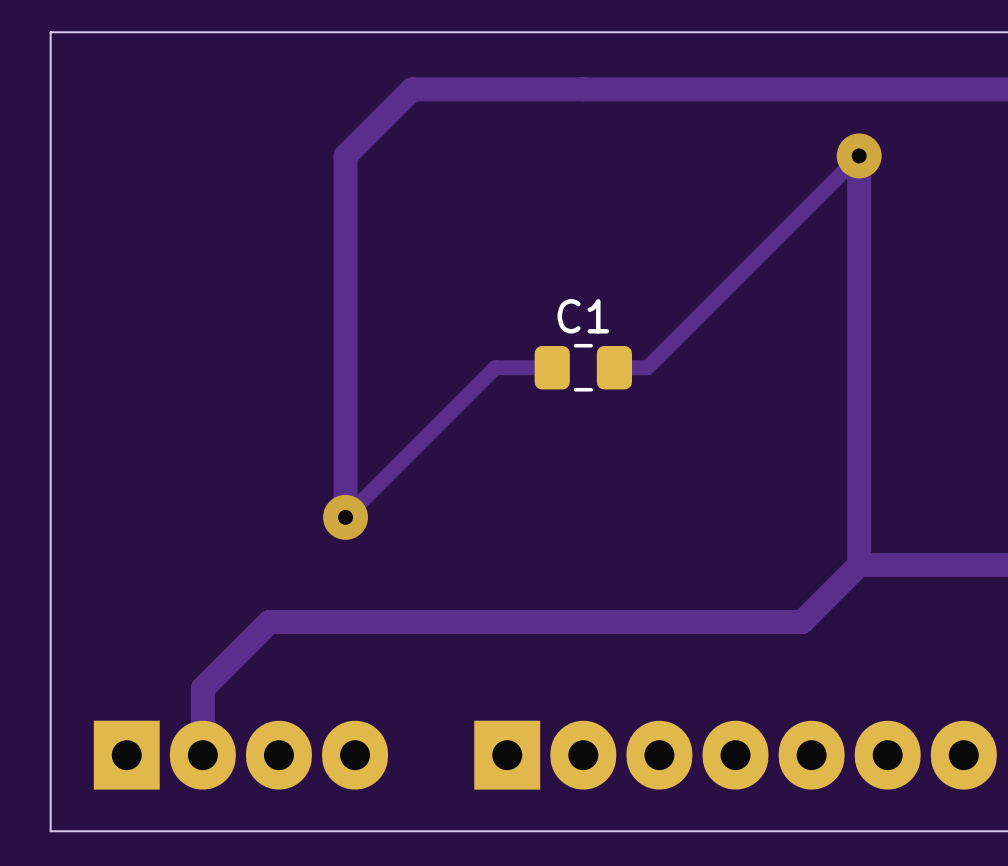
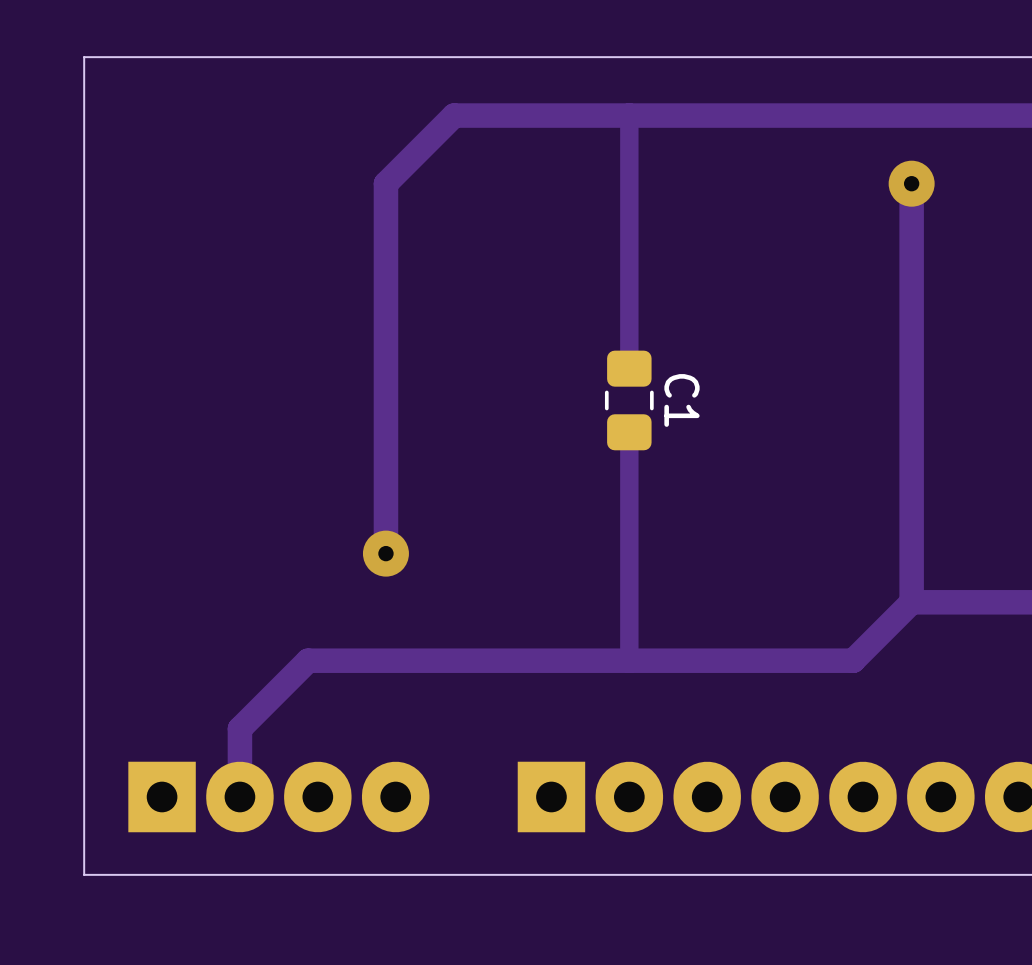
track: none -> (629, 115) (629, 368)
track: (859, 155) (647, 367) (614, 367) -> none
track: (552, 367) (495, 367) (345, 517) -> none
C1 rotation: 0° (583, 367) -> 90° clockwise (629, 400)
track: none -> (629, 432) (629, 660)

